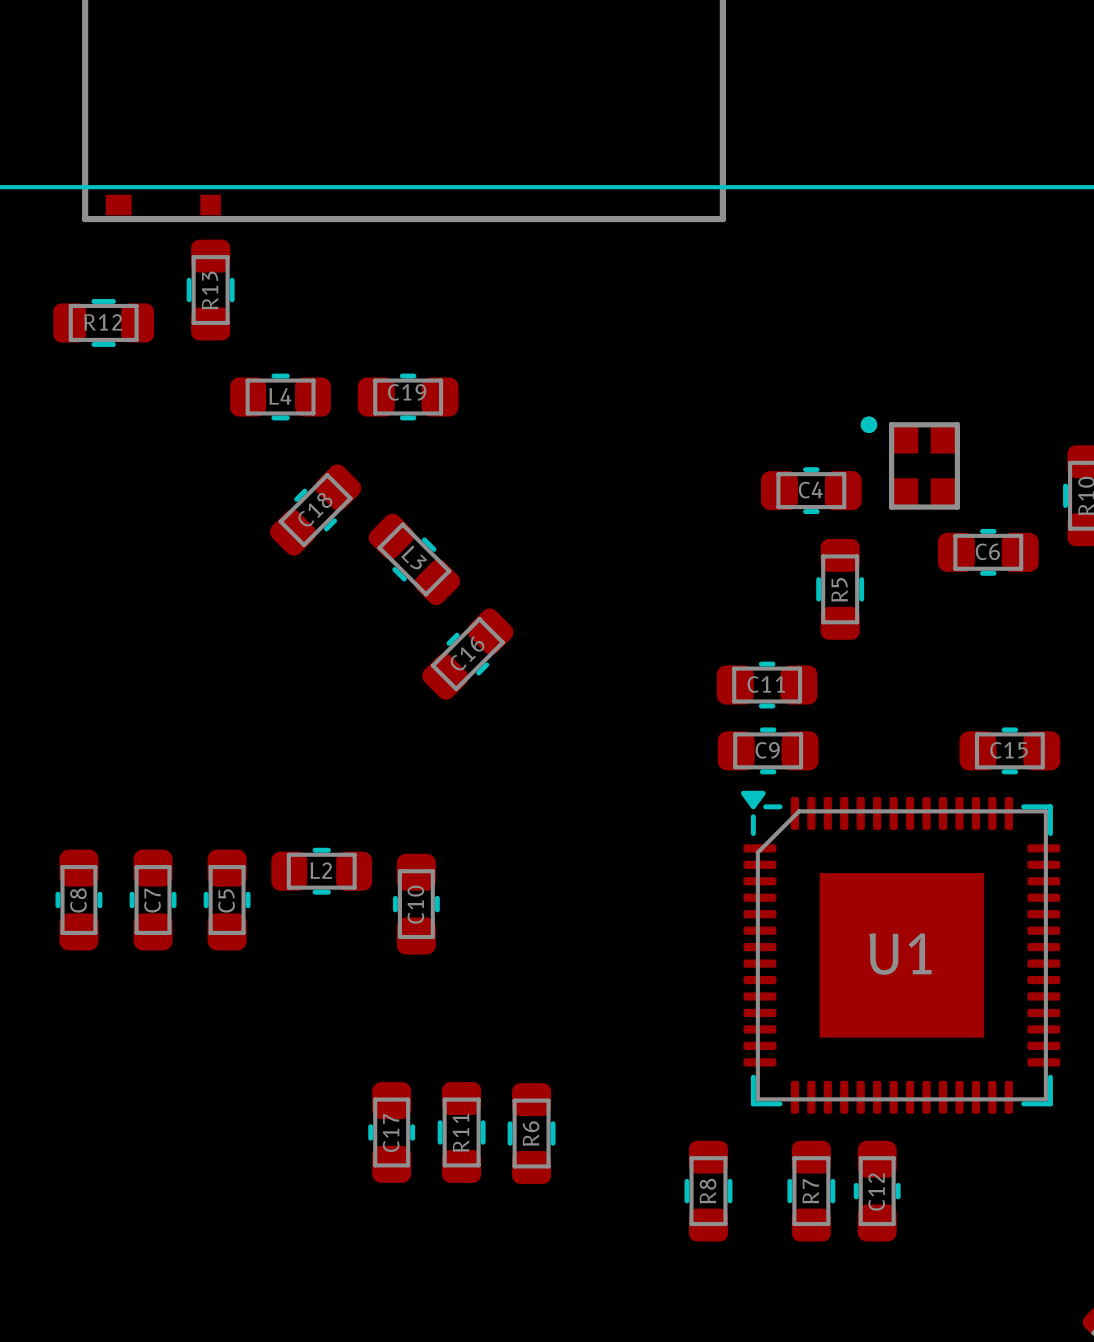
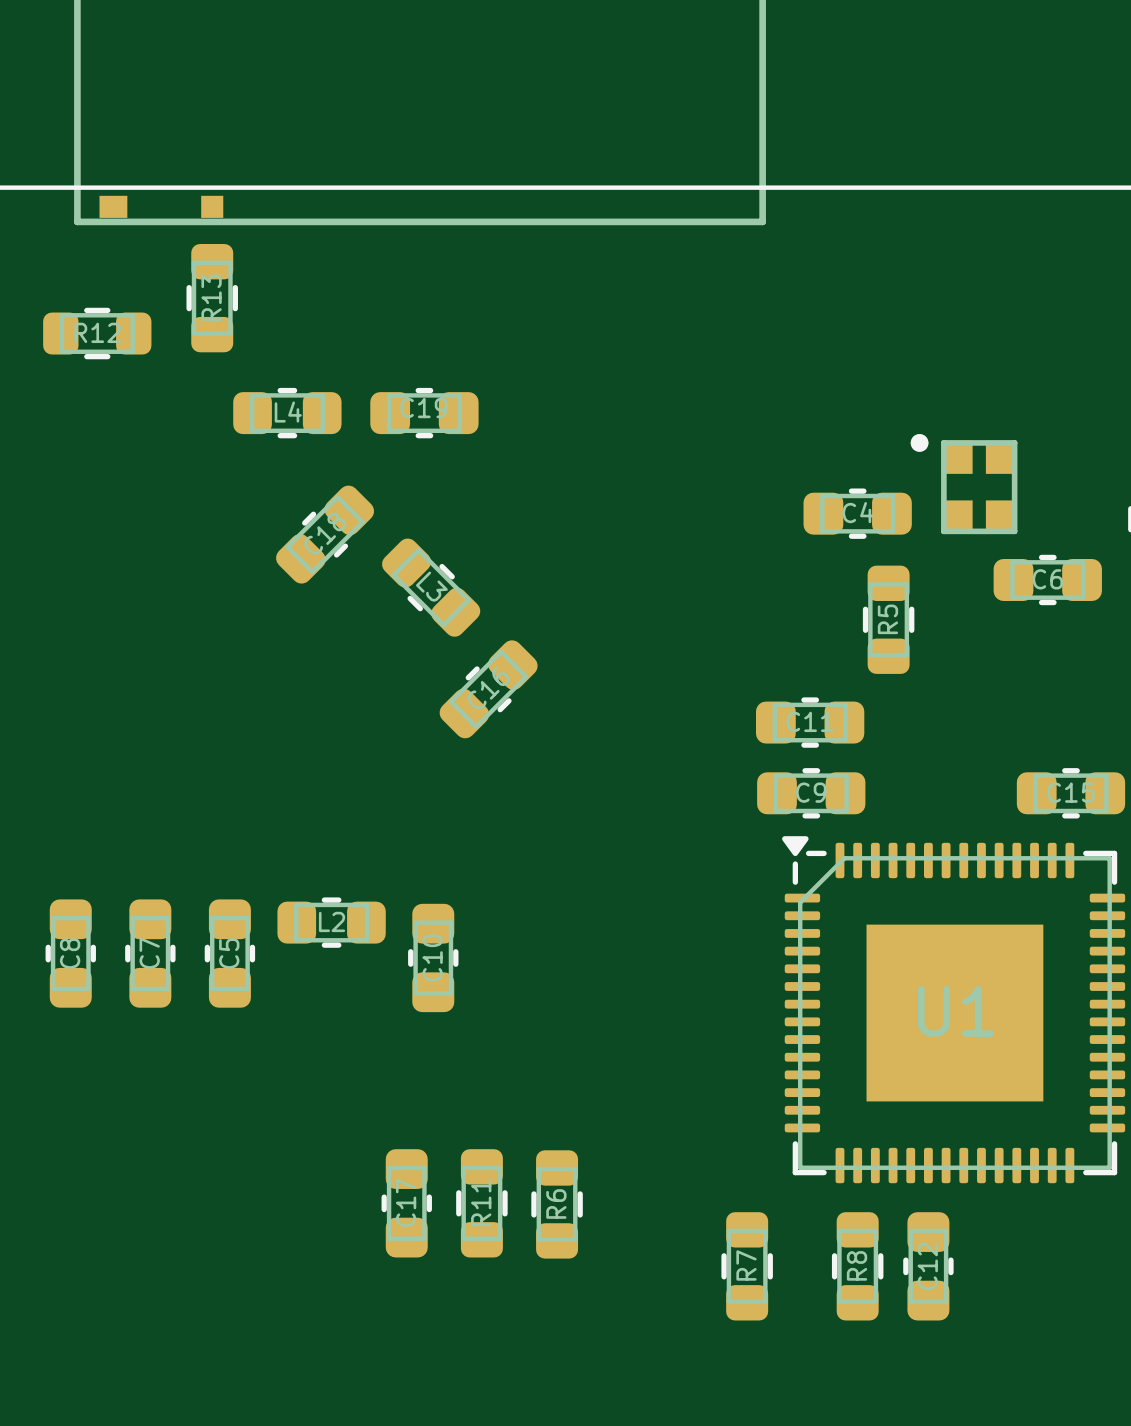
R8 name: R8 (707, 1191) -> R7 (746, 1265)
R7 name: R7 (810, 1191) -> R8 (857, 1265)

